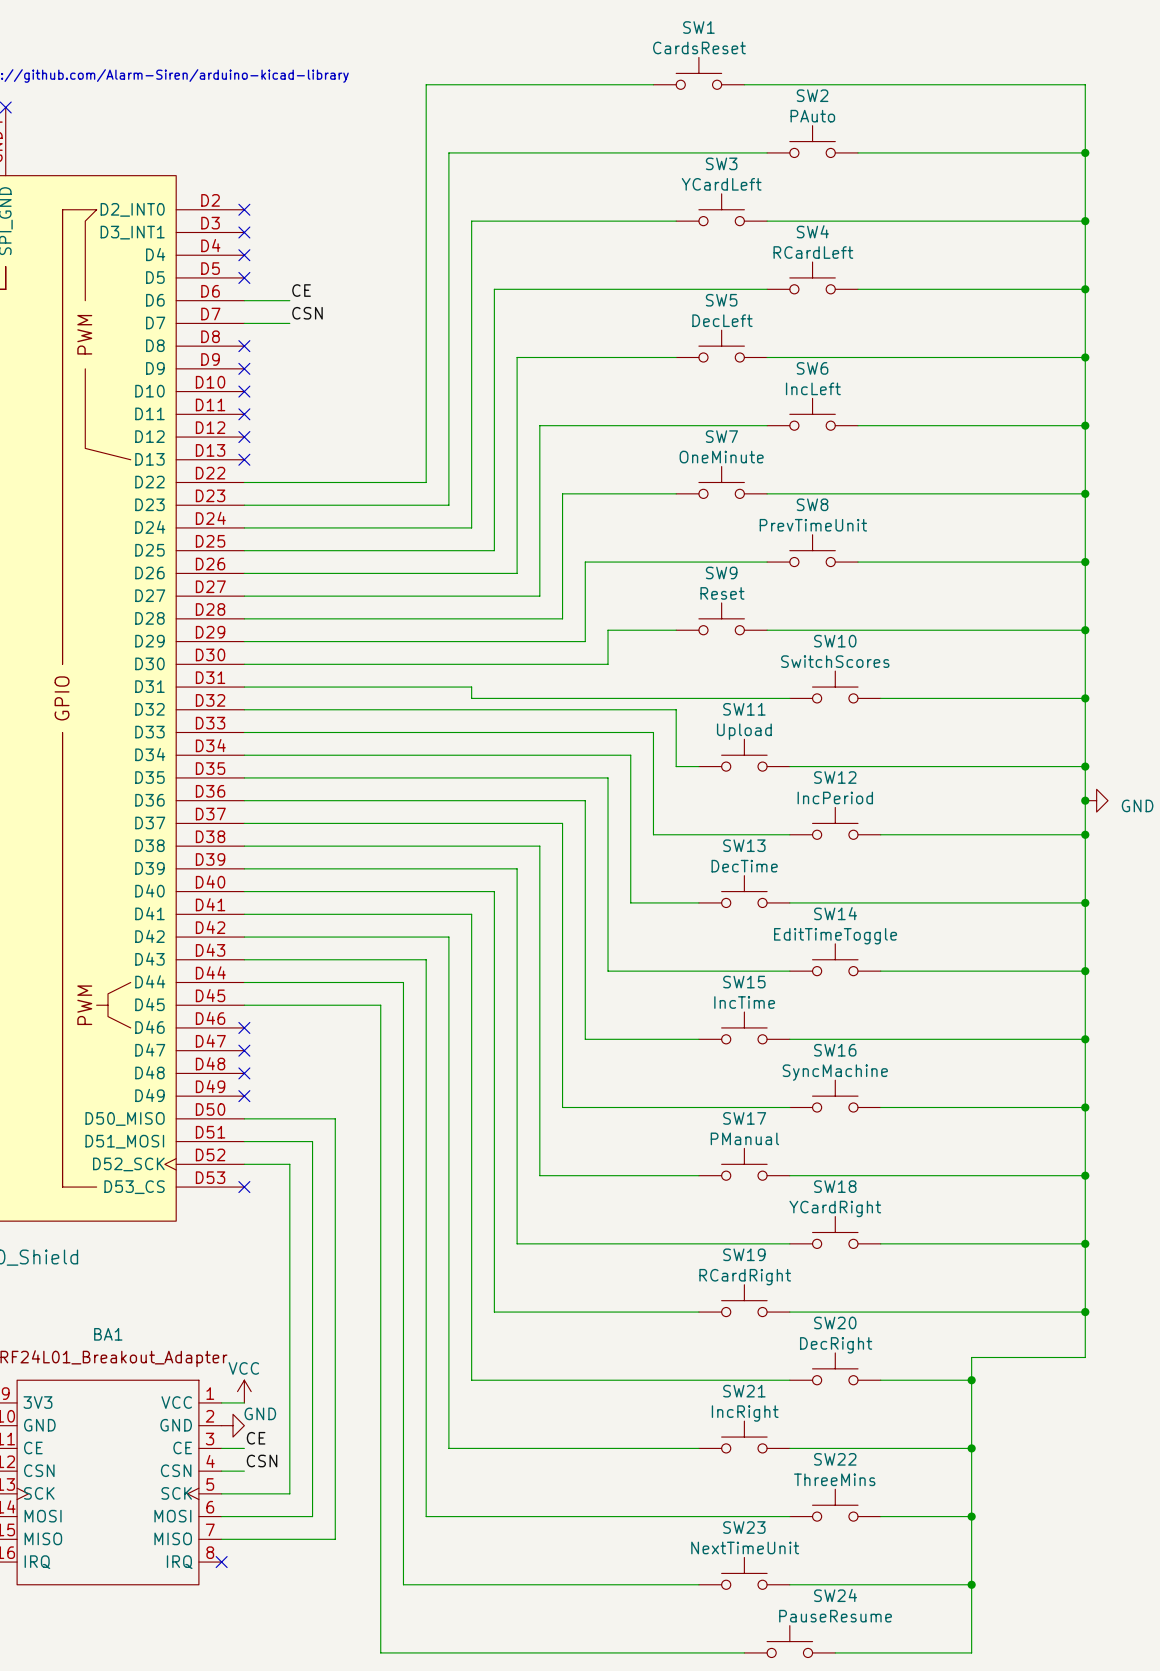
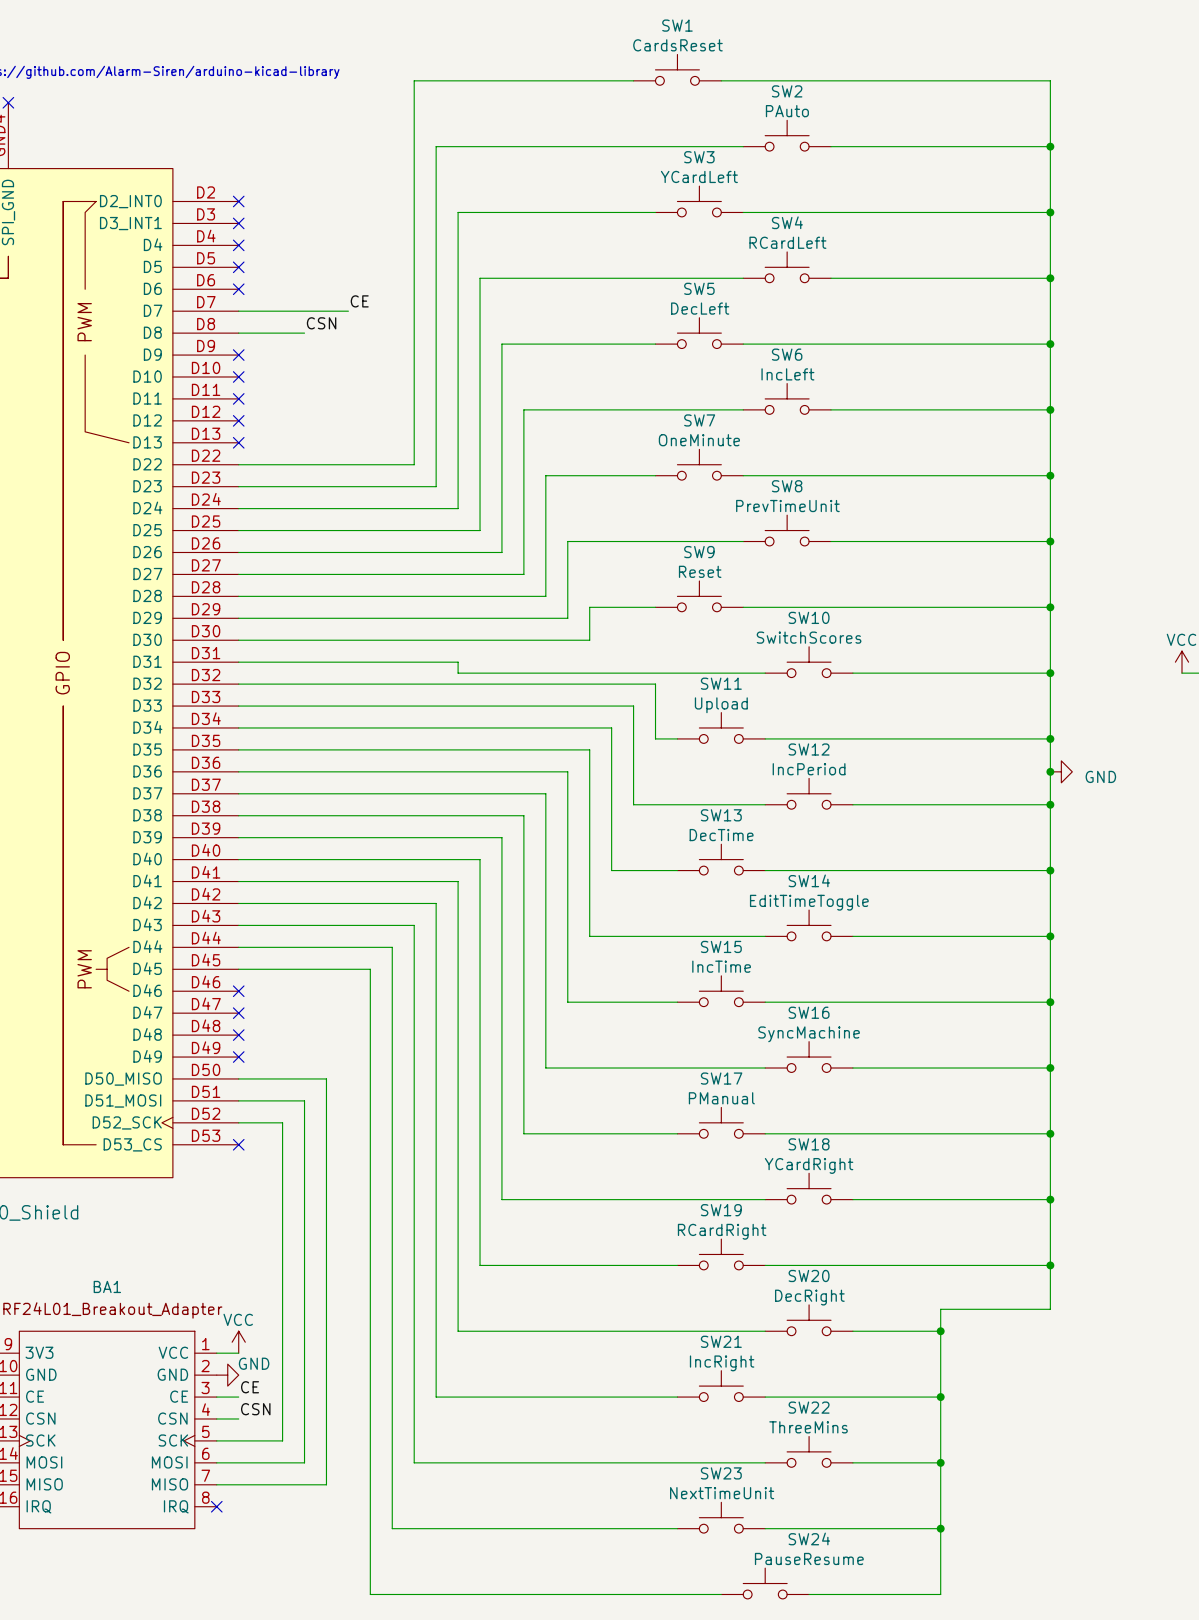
label position: CE (301, 290) -> CE (359, 301)
wire: (244, 300) (289, 300) -> none
label position: CSN (307, 313) -> CSN (321, 323)
wire: none -> (282, 311) (348, 311)
wire: none -> (238, 333) (304, 333)
no-connect mark position: (244, 346) -> (238, 289)

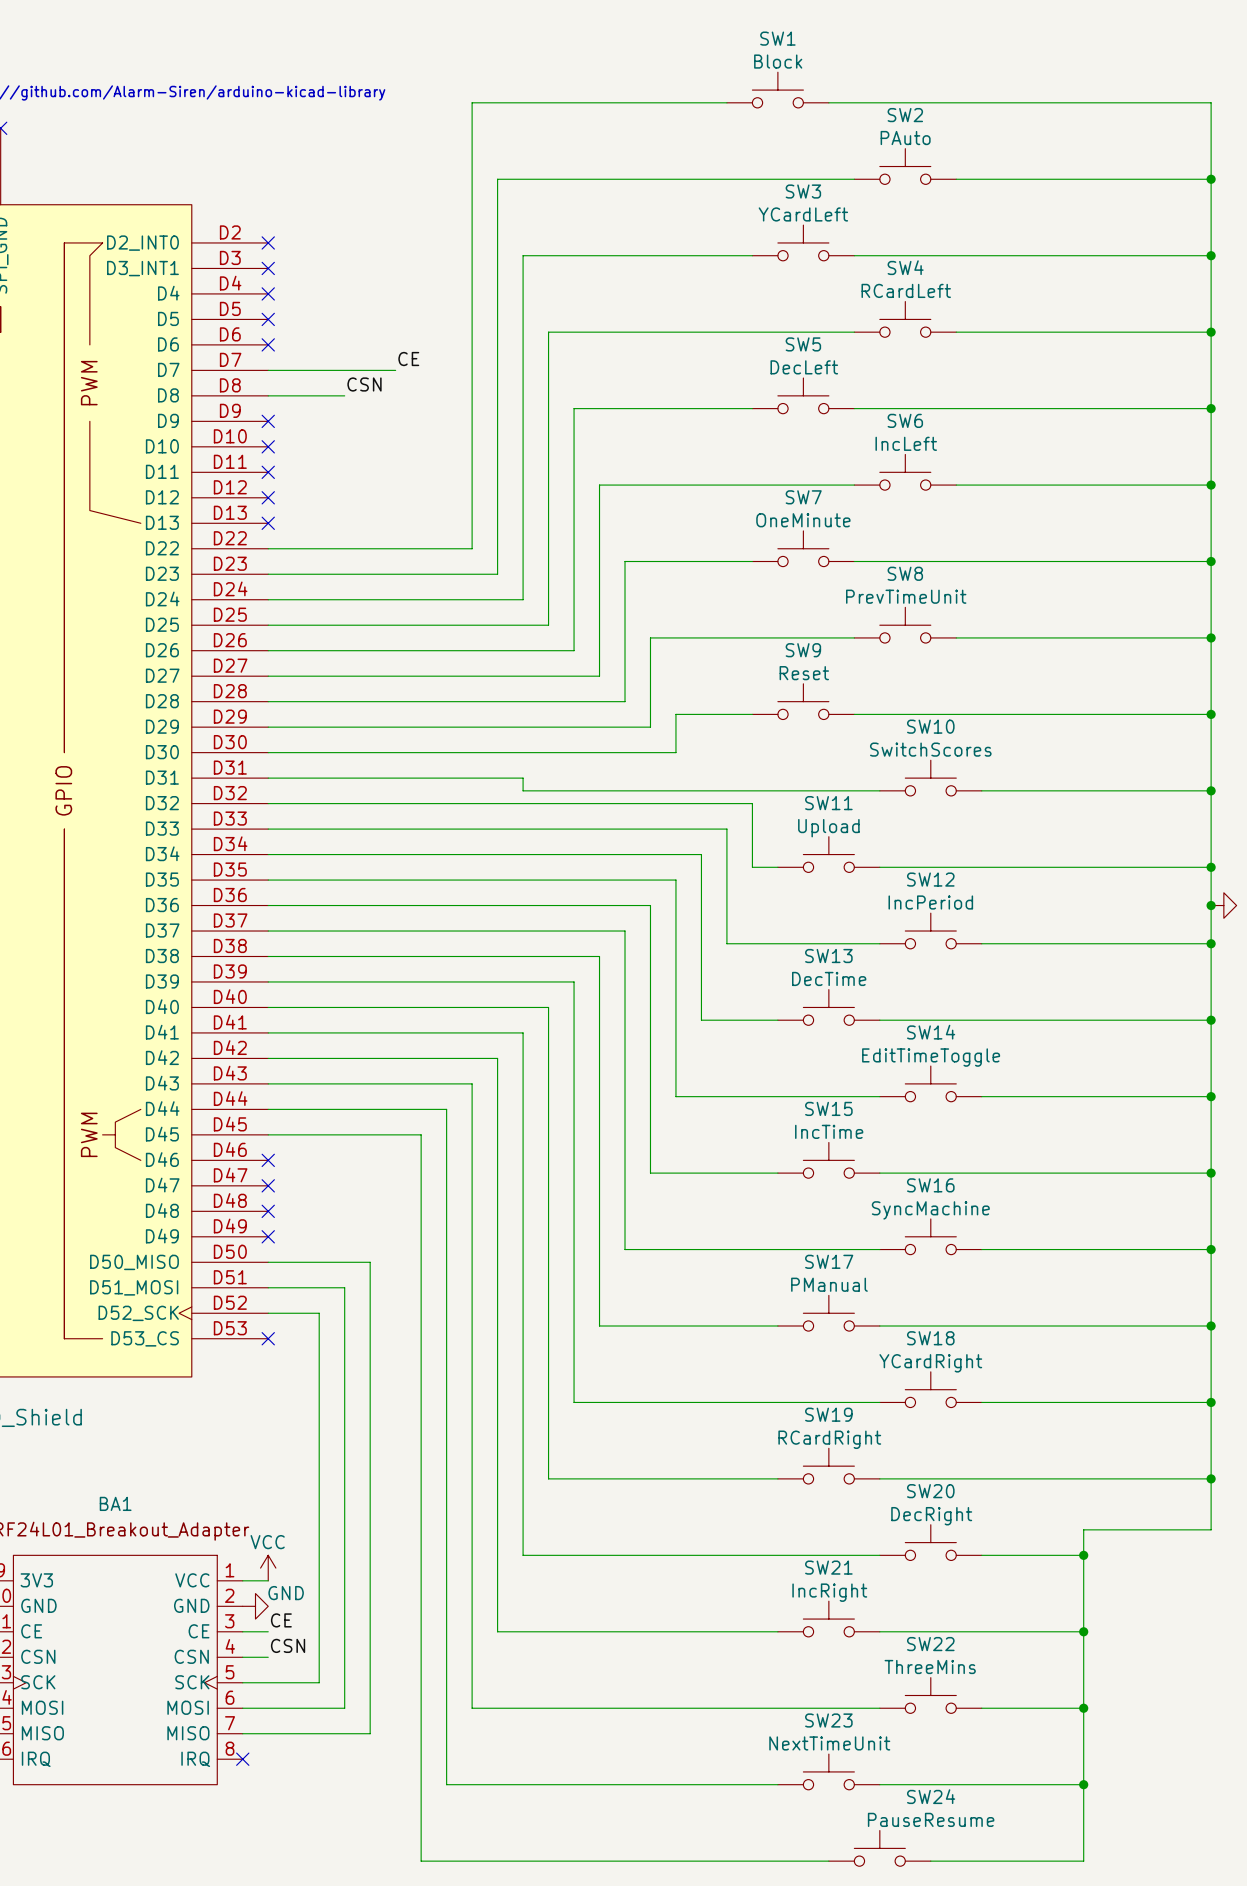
SW1 value: CardsReset (677, 45) -> Block (778, 61)

